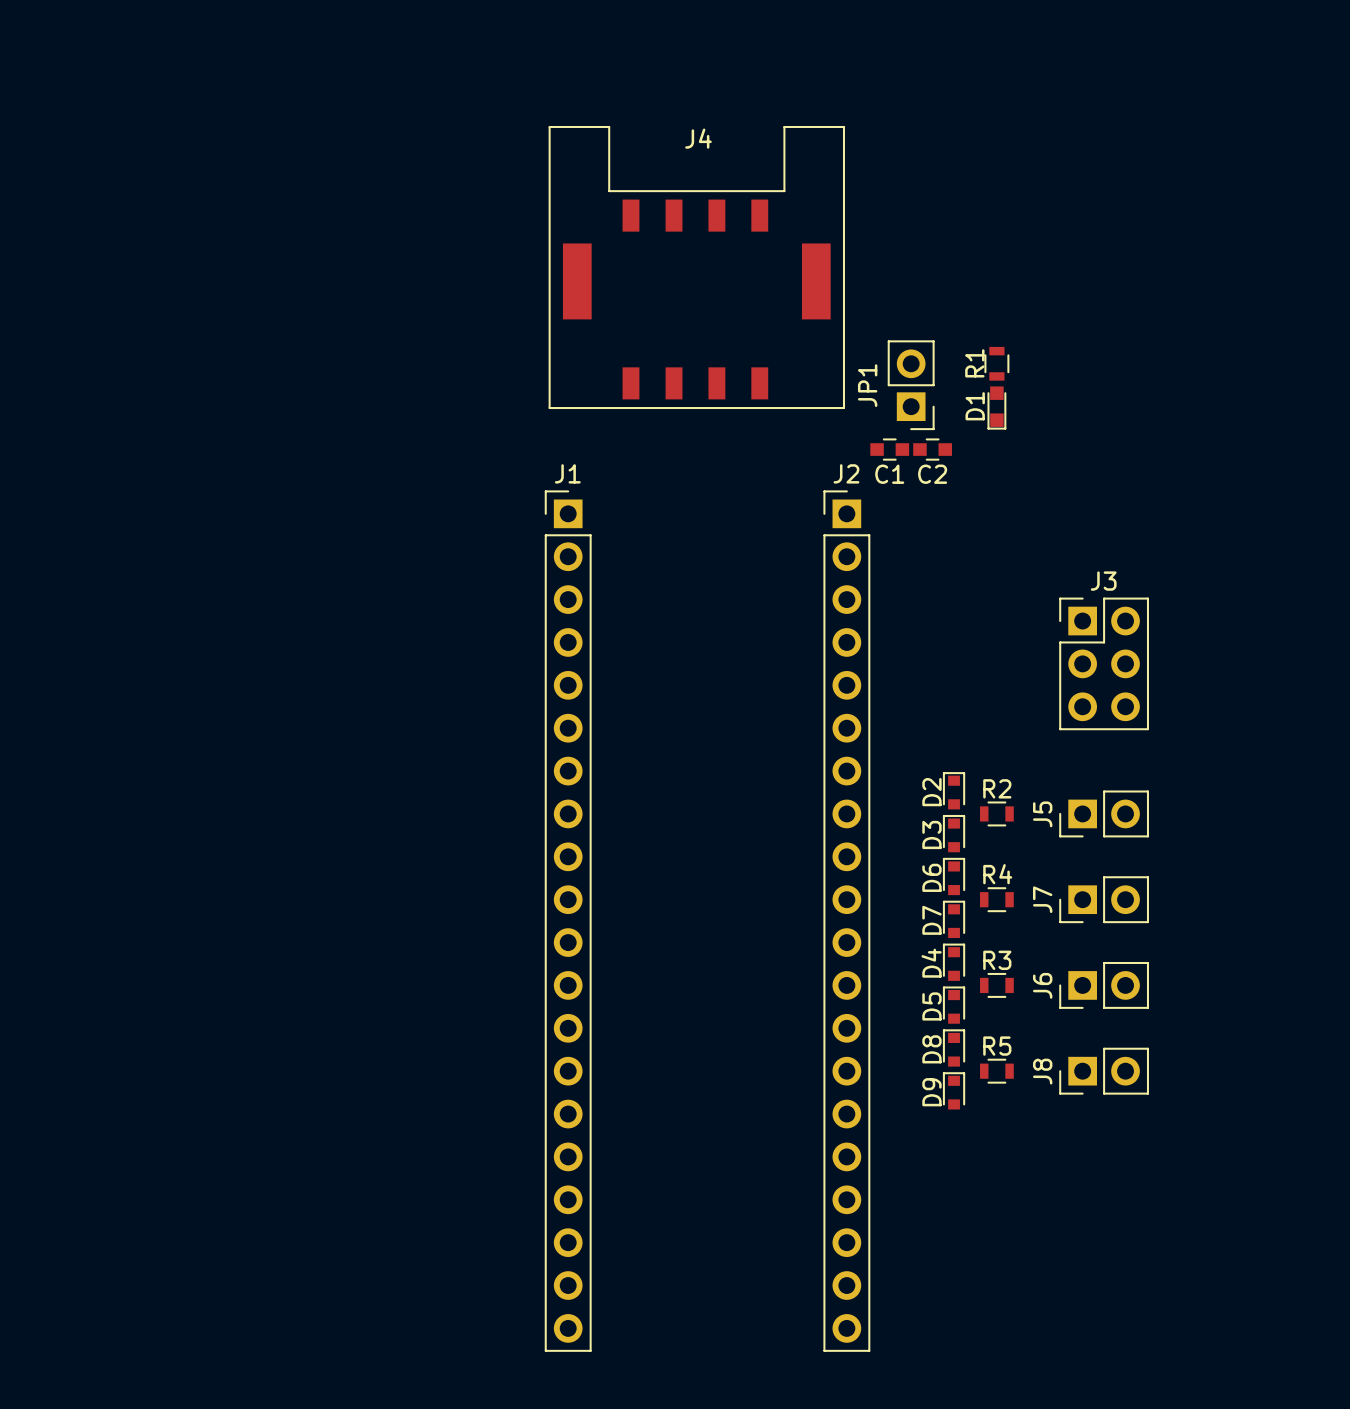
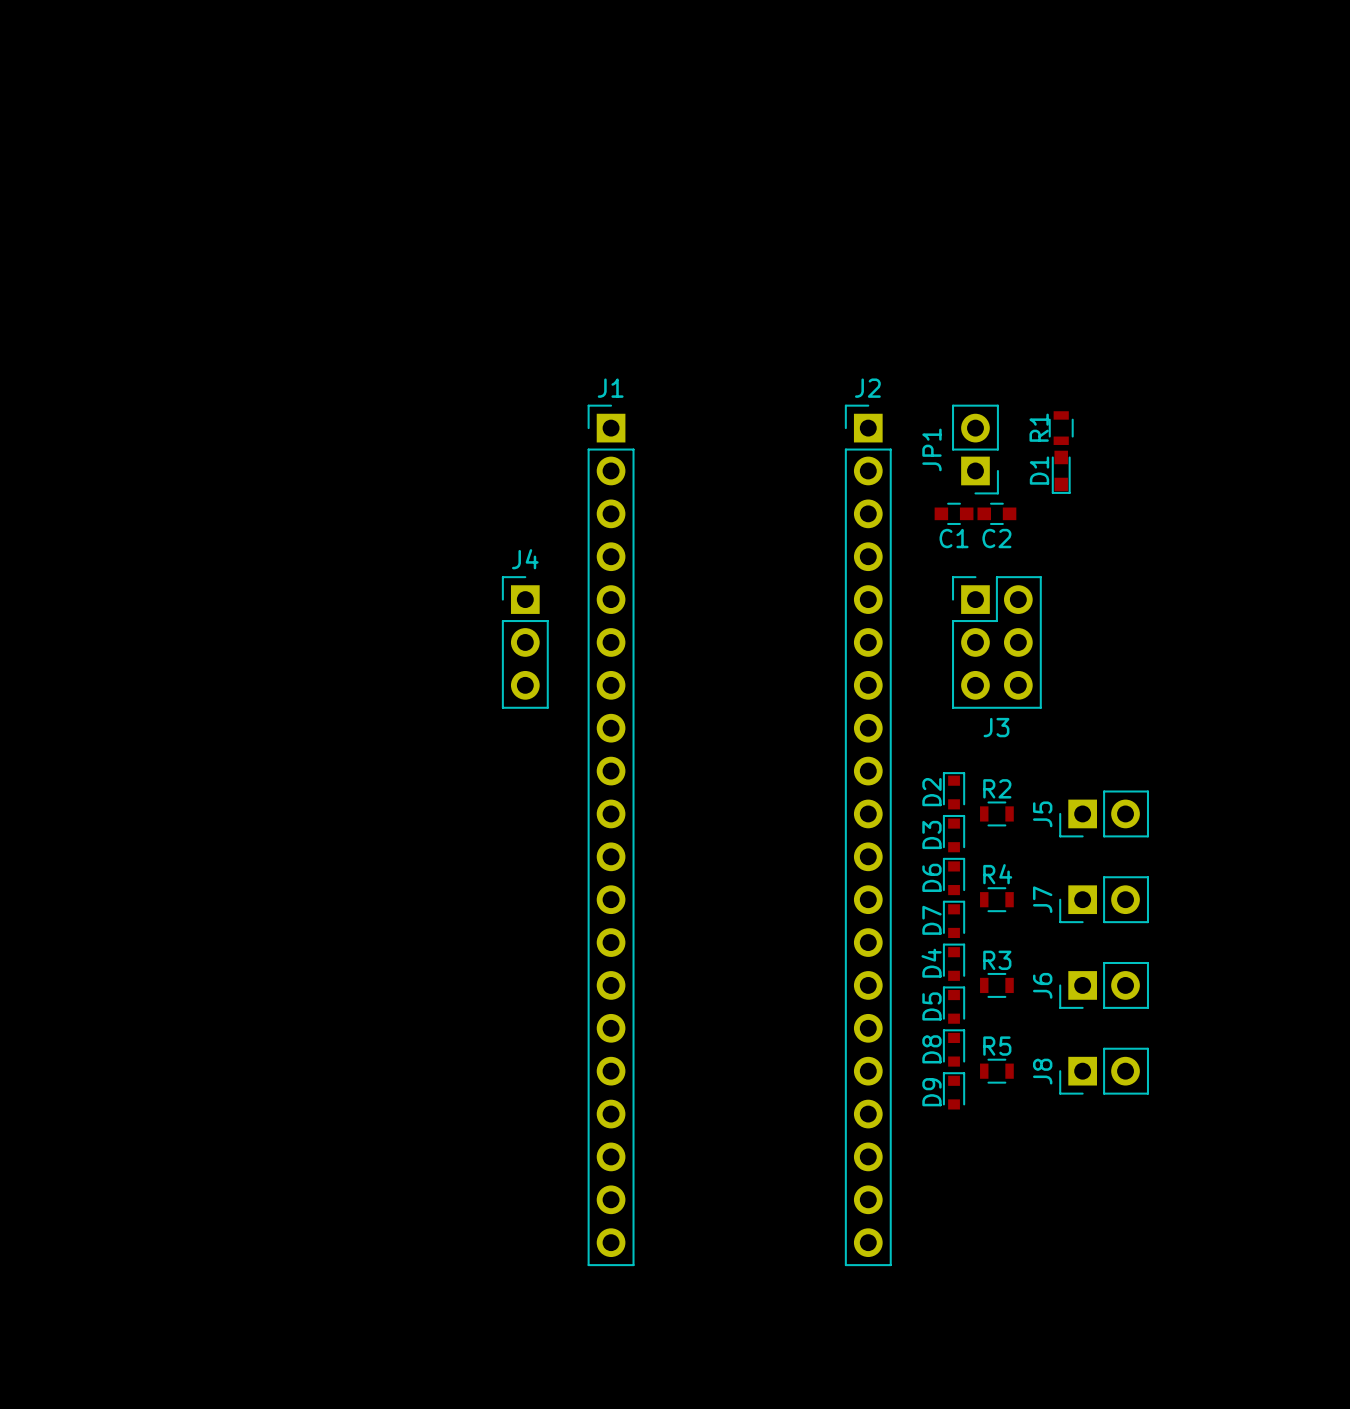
J4 footprint: [548, 125, 846, 410] -> [501, 576, 549, 709]
J4 name position: J4 (698, 138) -> J4 (525, 559)
R1 position: (996, 363) -> (1061, 428)
JP1 position: (911, 385) -> (975, 449)
D1 position: (996, 408) -> (1061, 472)
C1 position: (889, 449) -> (954, 513)
C2 position: (932, 449) -> (996, 513)
J3 name position: J3 (1103, 581) -> J3 (996, 727)
J3 position: (1104, 663) -> (996, 642)
J1 position: (568, 921) -> (611, 835)
J2 position: (846, 921) -> (868, 835)

